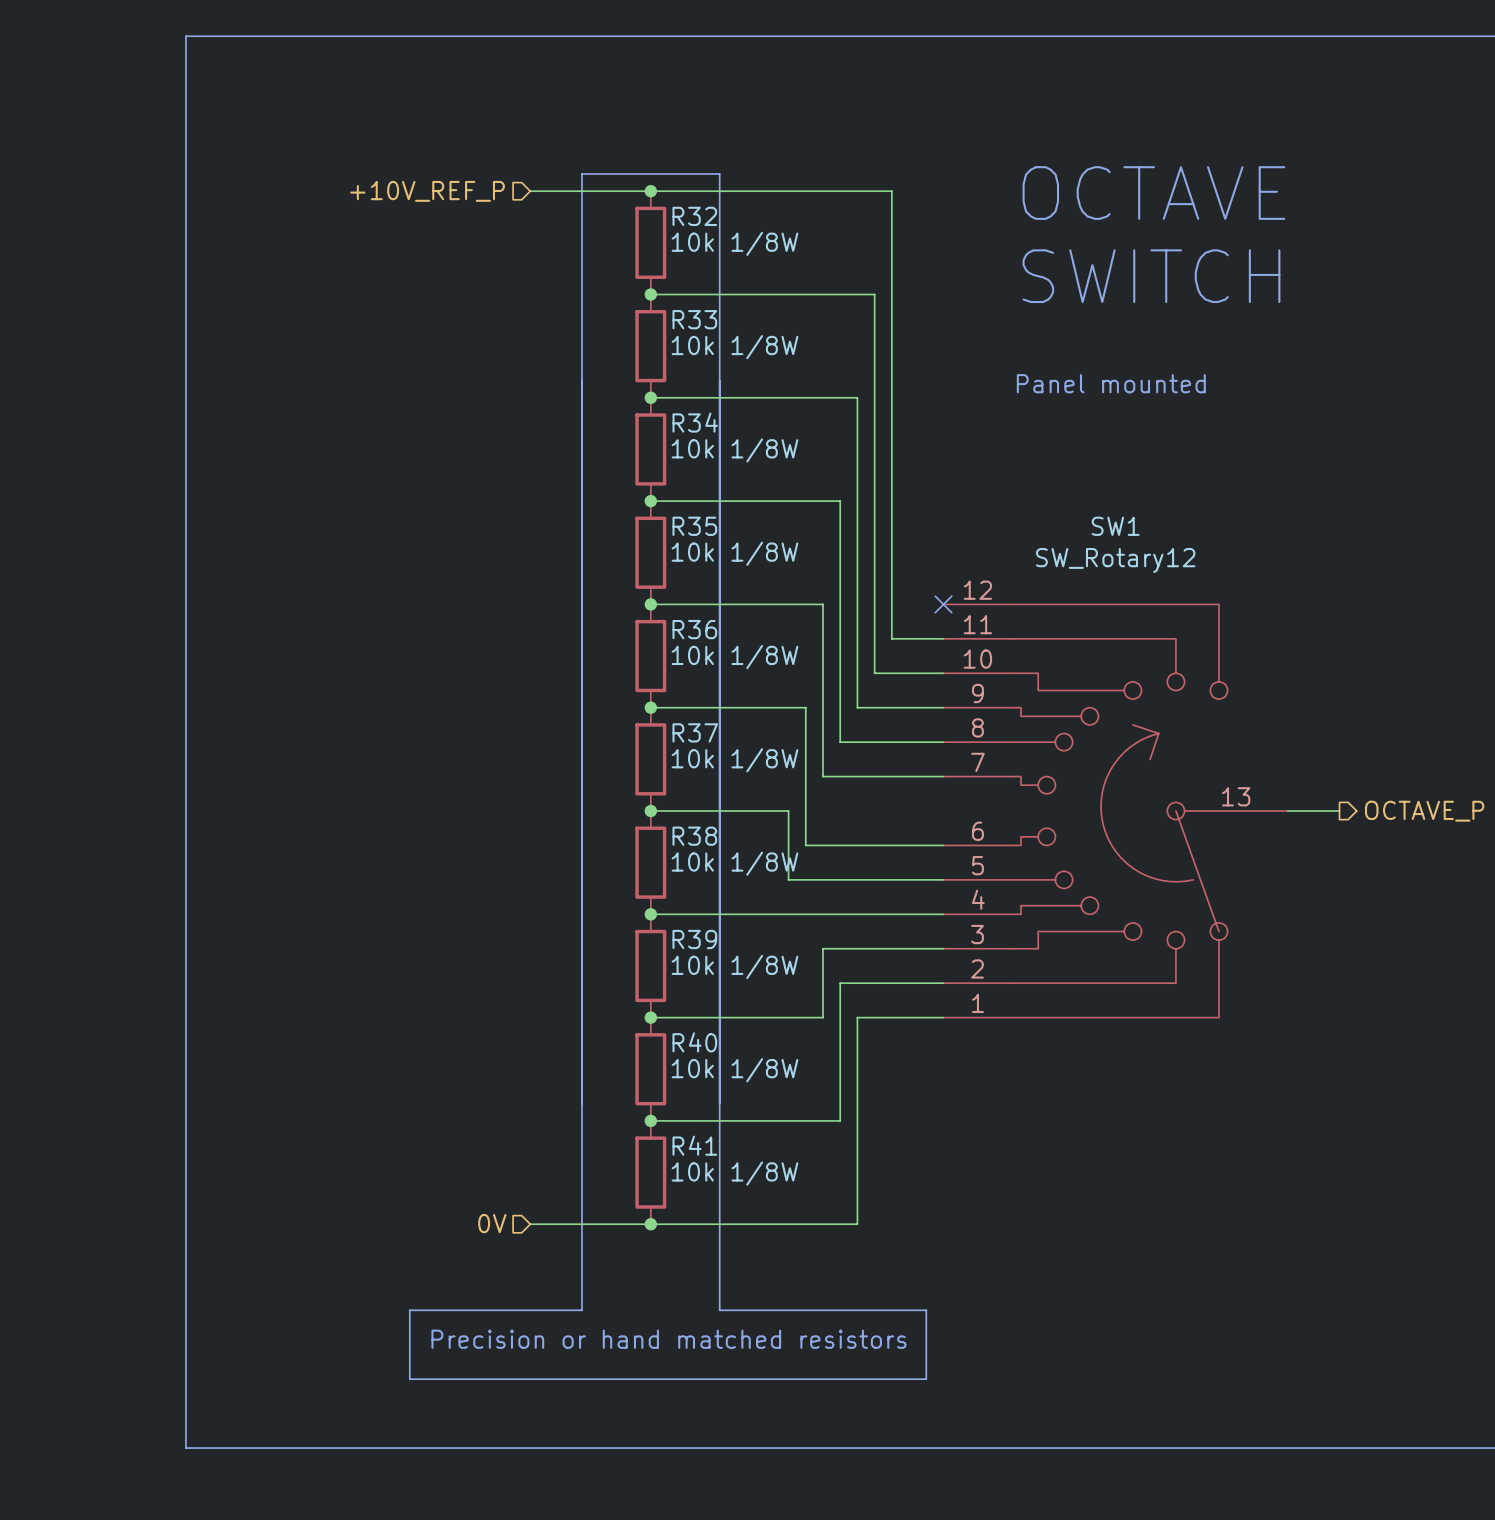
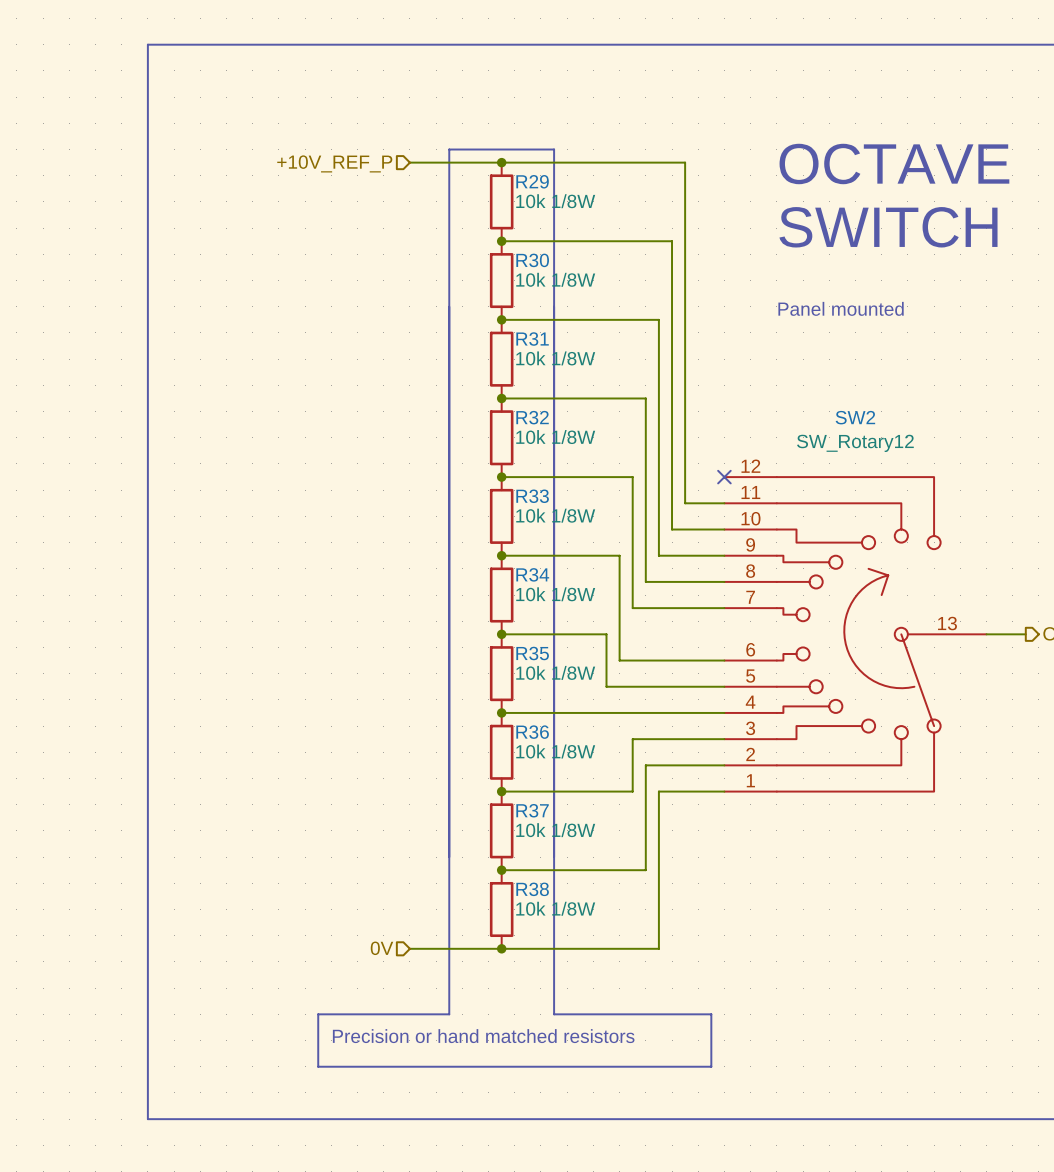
R32 name: R32 (694, 216) -> R29 (532, 181)
R33 name: R33 (694, 319) -> R30 (532, 260)
R34 name: R34 (695, 422) -> R31 (532, 339)
R35 name: R35 (694, 526) -> R32 (532, 417)
SW1 name: SW1 (1115, 526) -> SW2 (855, 417)
R36 name: R36 (694, 629) -> R33 (532, 496)
R37 name: R37 (695, 732) -> R34 (532, 574)
R38 name: R38 (694, 836) -> R35 (532, 653)
R39 name: R39 (694, 939) -> R36 (532, 732)
R40 name: R40 (694, 1042) -> R37 (532, 810)
R41 name: R41 (694, 1145) -> R38 (532, 889)

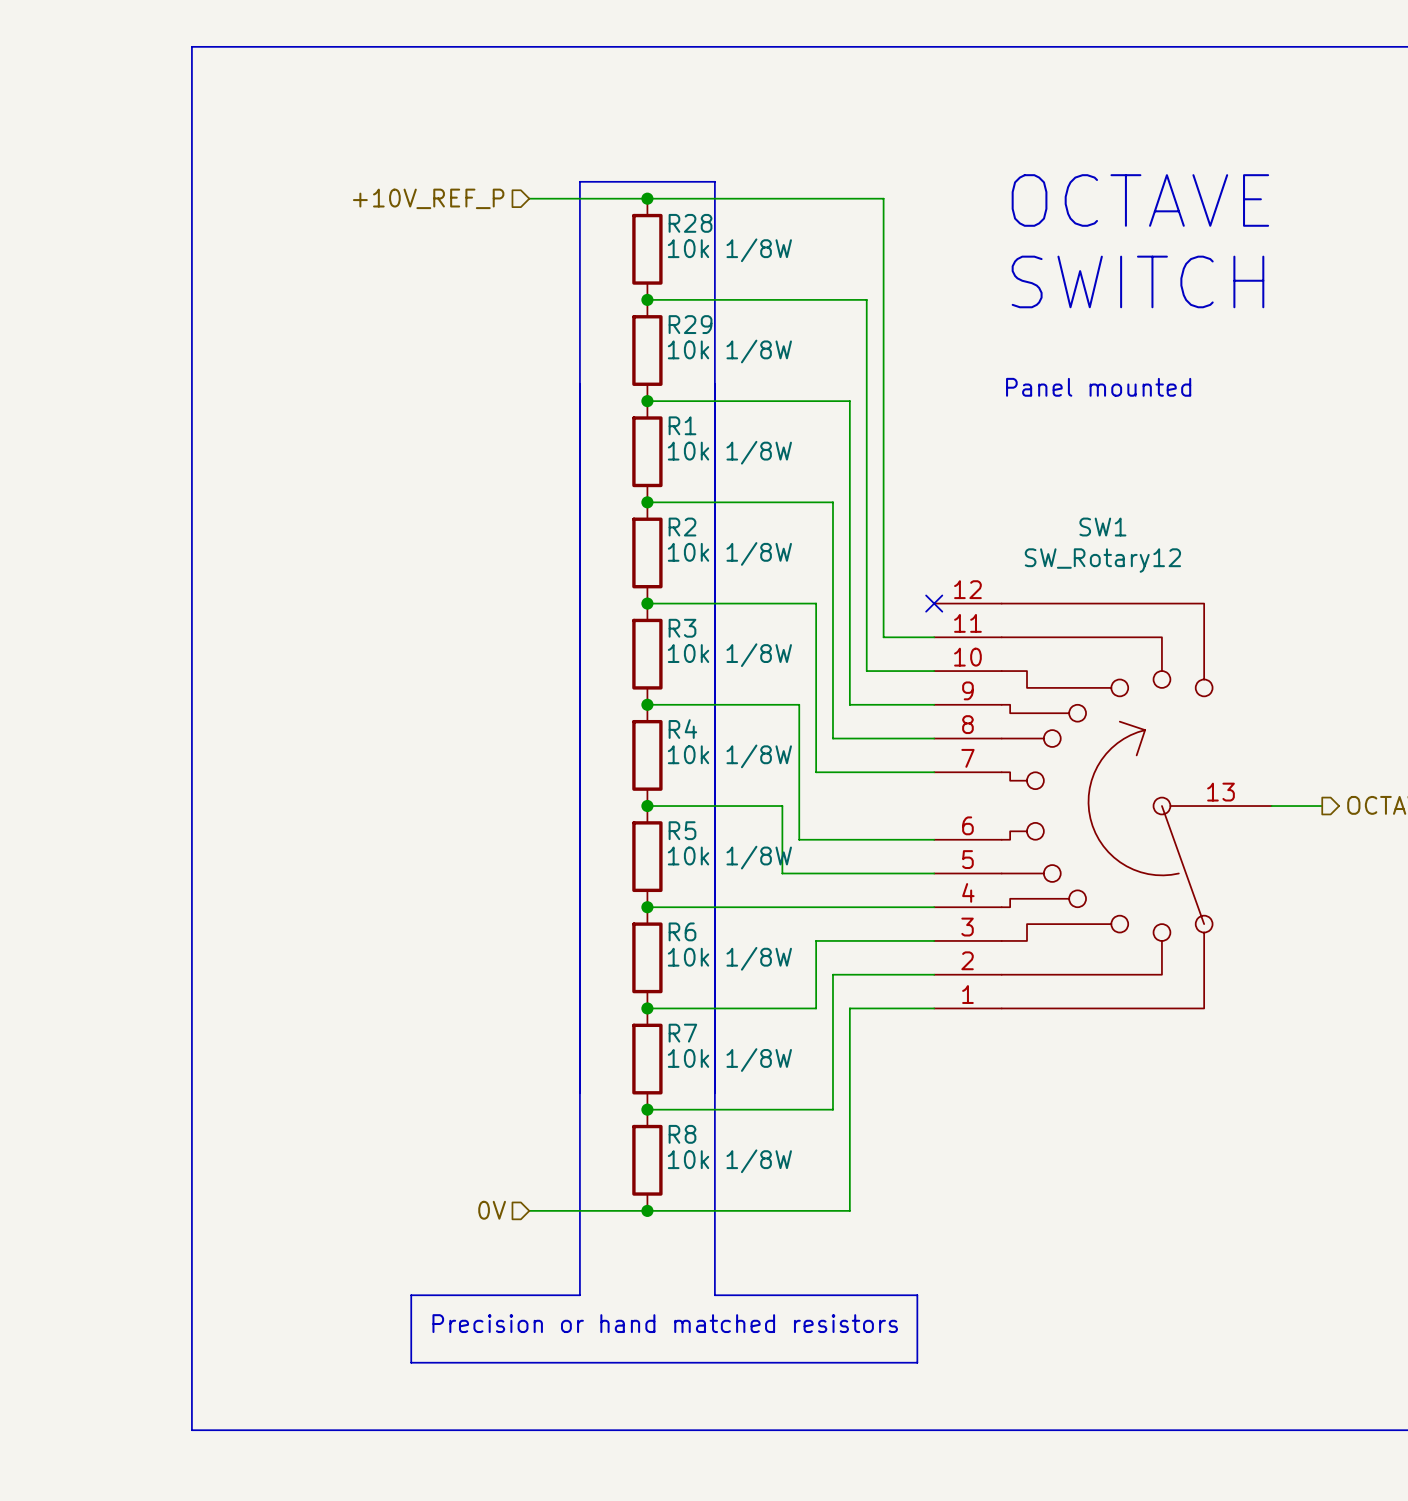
R29 name: R29 (532, 181) -> R28 (690, 223)
R30 name: R30 (532, 260) -> R29 (690, 324)
R31 name: R31 (532, 339) -> R1 (682, 425)
R32 name: R32 (532, 417) -> R2 (682, 527)
SW2 name: SW2 (855, 417) -> SW1 (1102, 527)
R33 name: R33 (532, 496) -> R3 (682, 628)
R34 name: R34 (532, 574) -> R4 (682, 729)
R35 name: R35 (532, 653) -> R5 (682, 830)
R36 name: R36 (532, 732) -> R6 (682, 931)
R37 name: R37 (532, 810) -> R7 (682, 1033)
R38 name: R38 (532, 889) -> R8 (682, 1134)

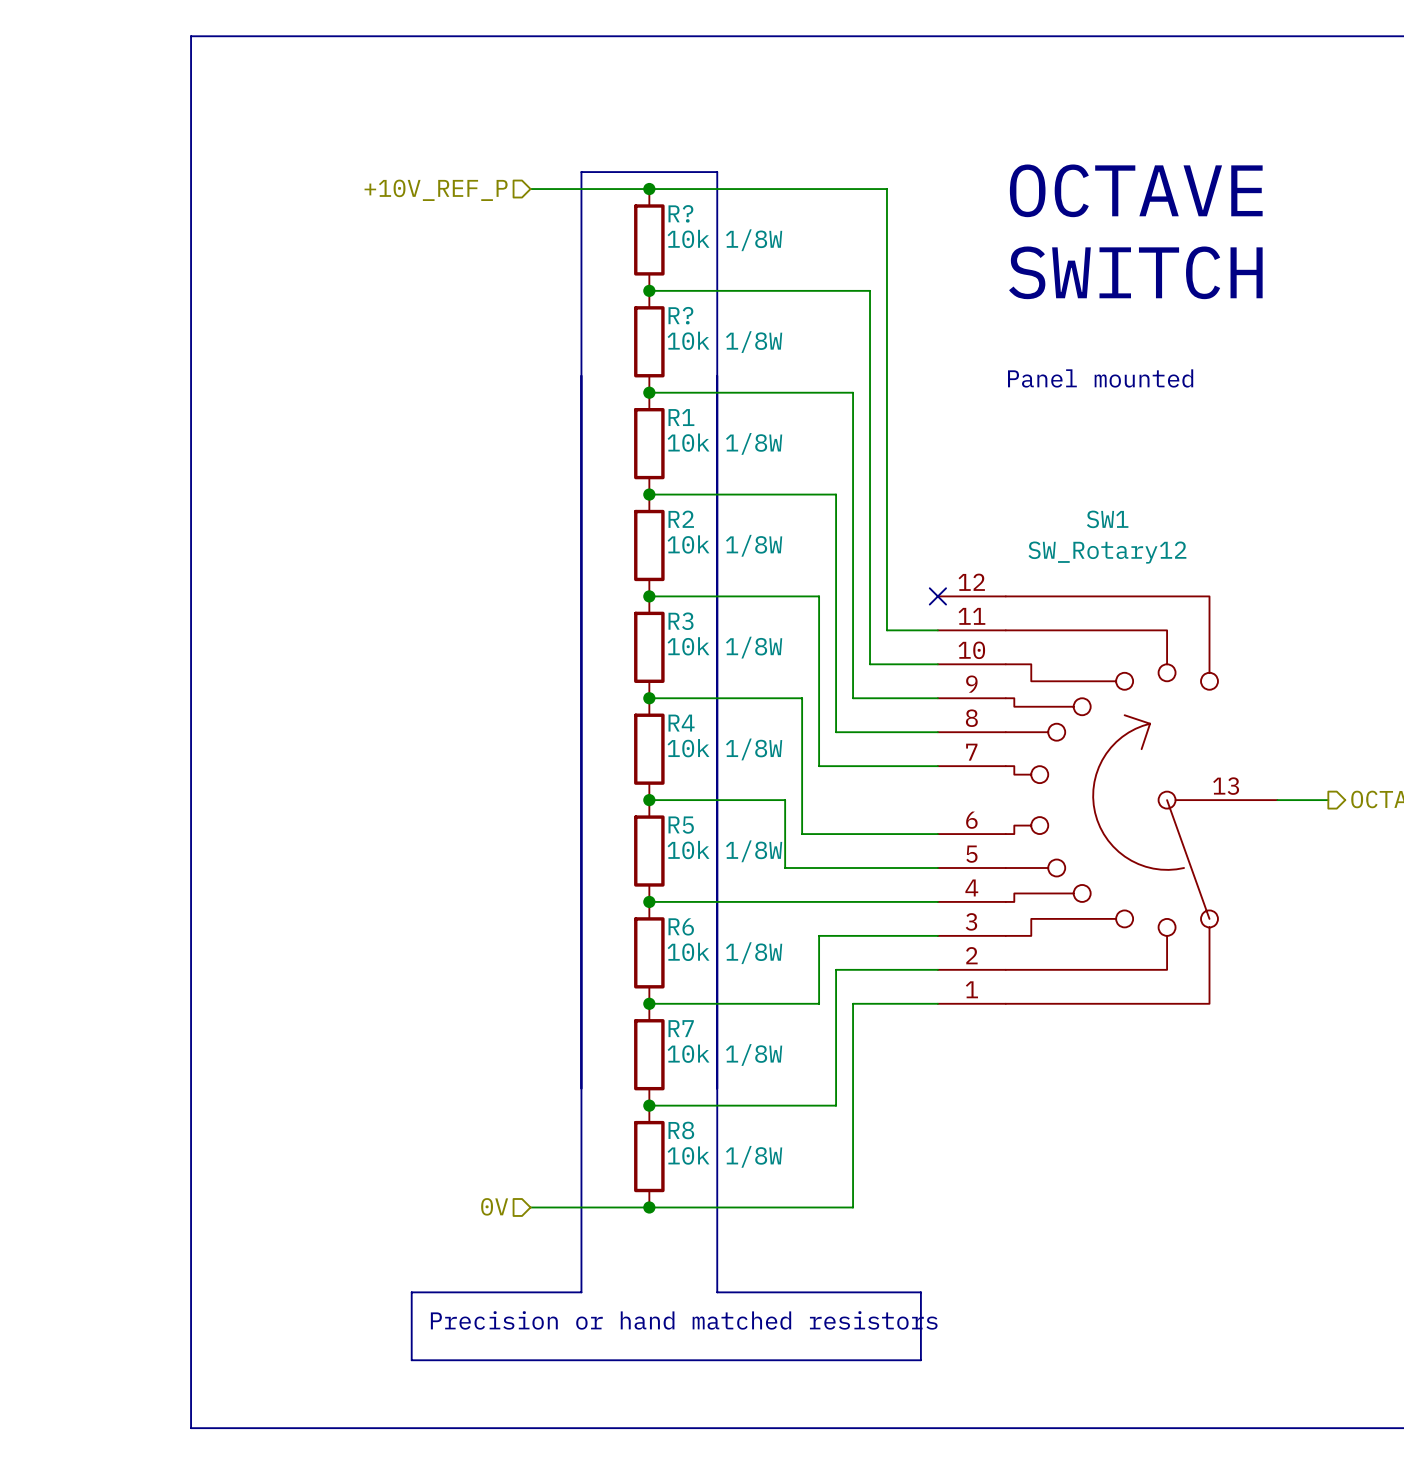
R28 name: R28 (690, 223) -> R? (680, 213)
R29 name: R29 (690, 324) -> R? (680, 315)

